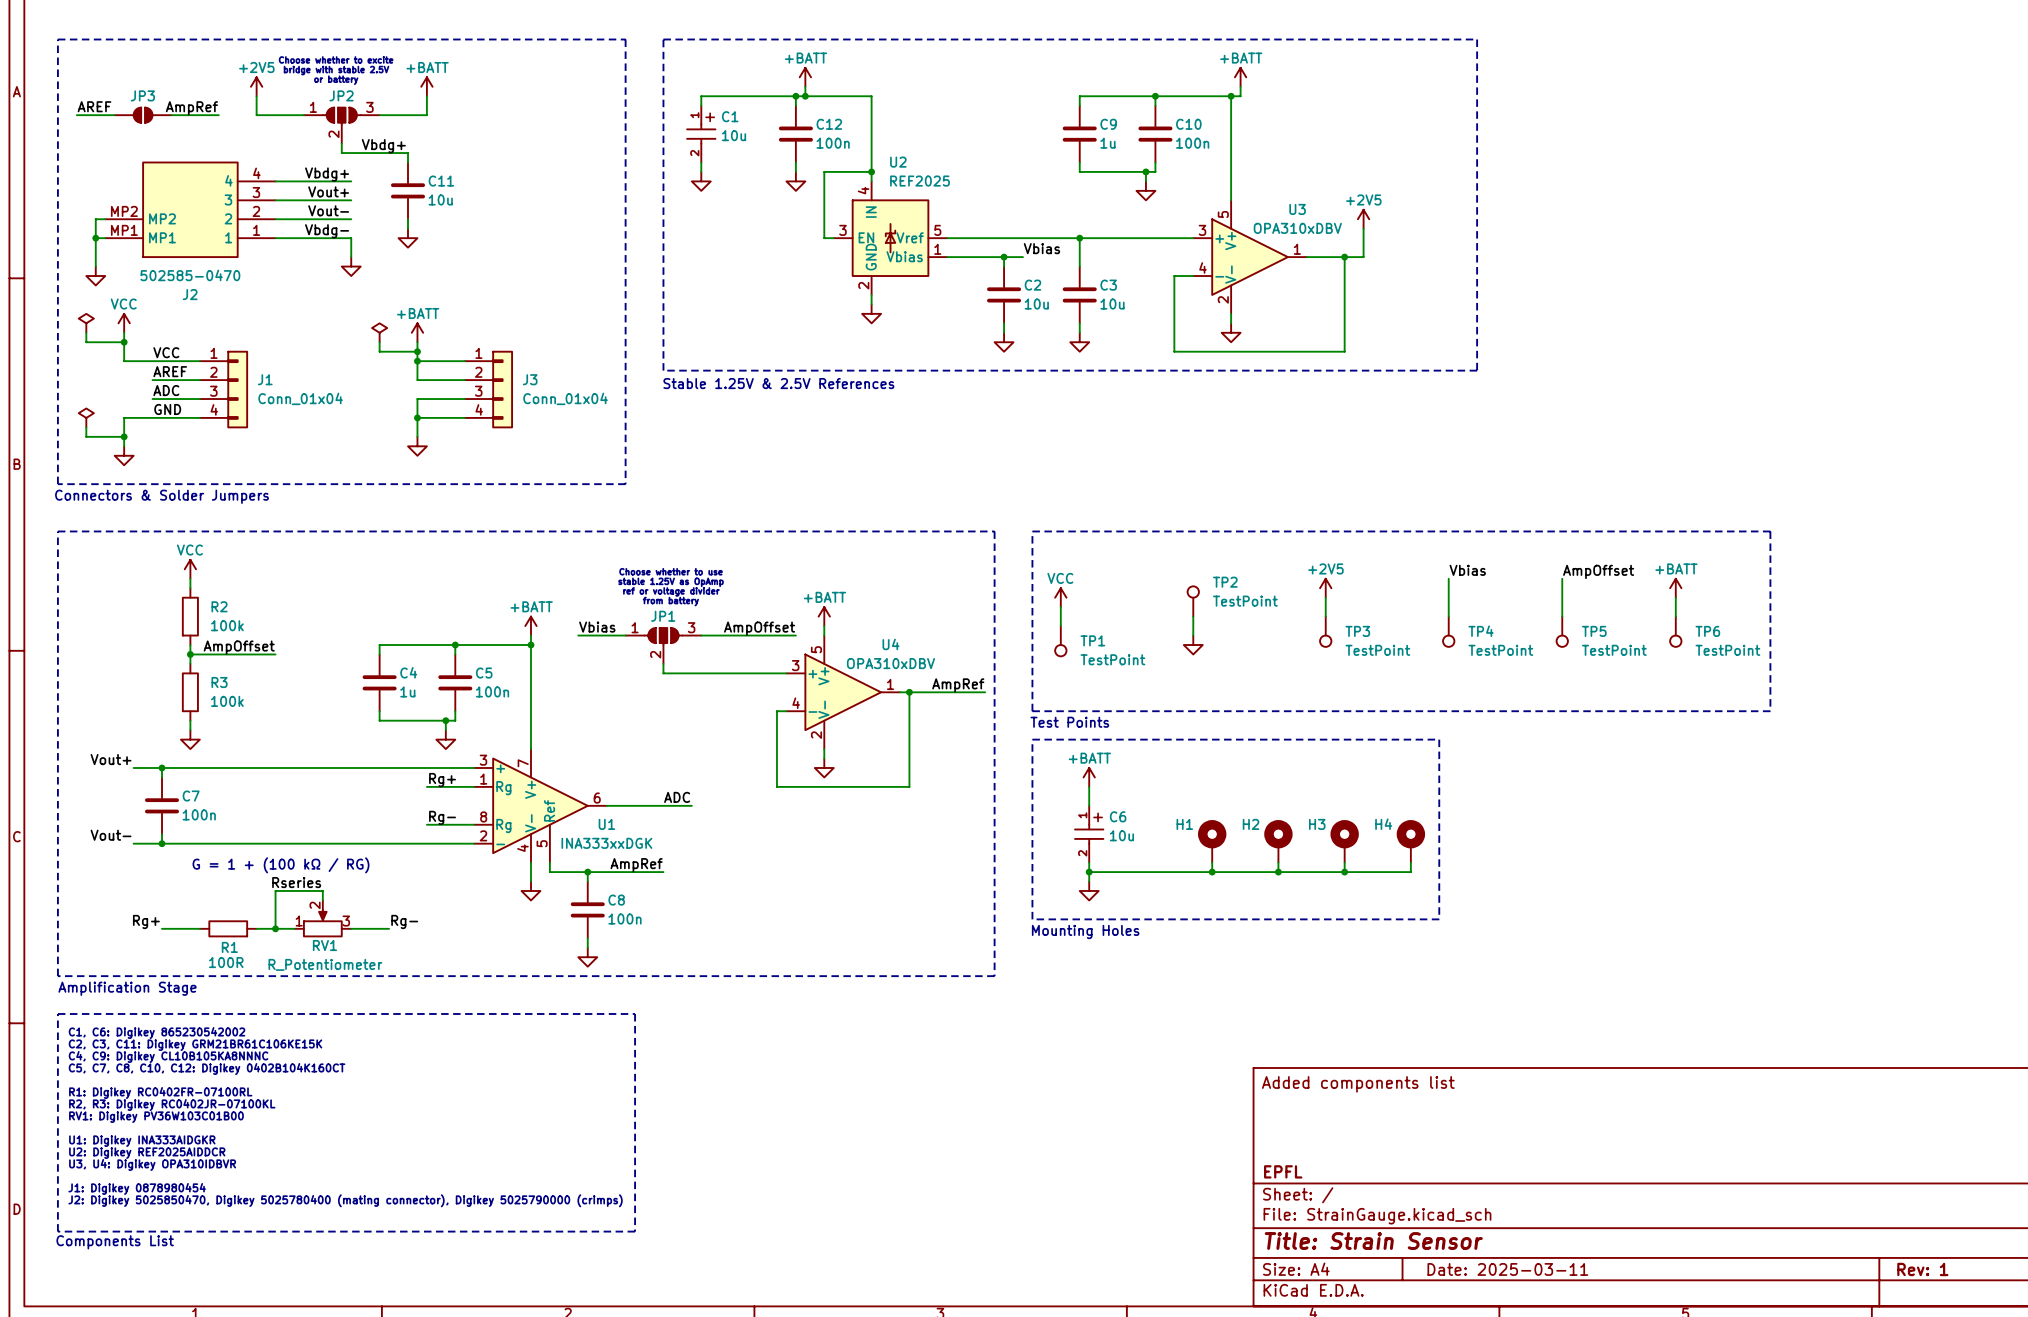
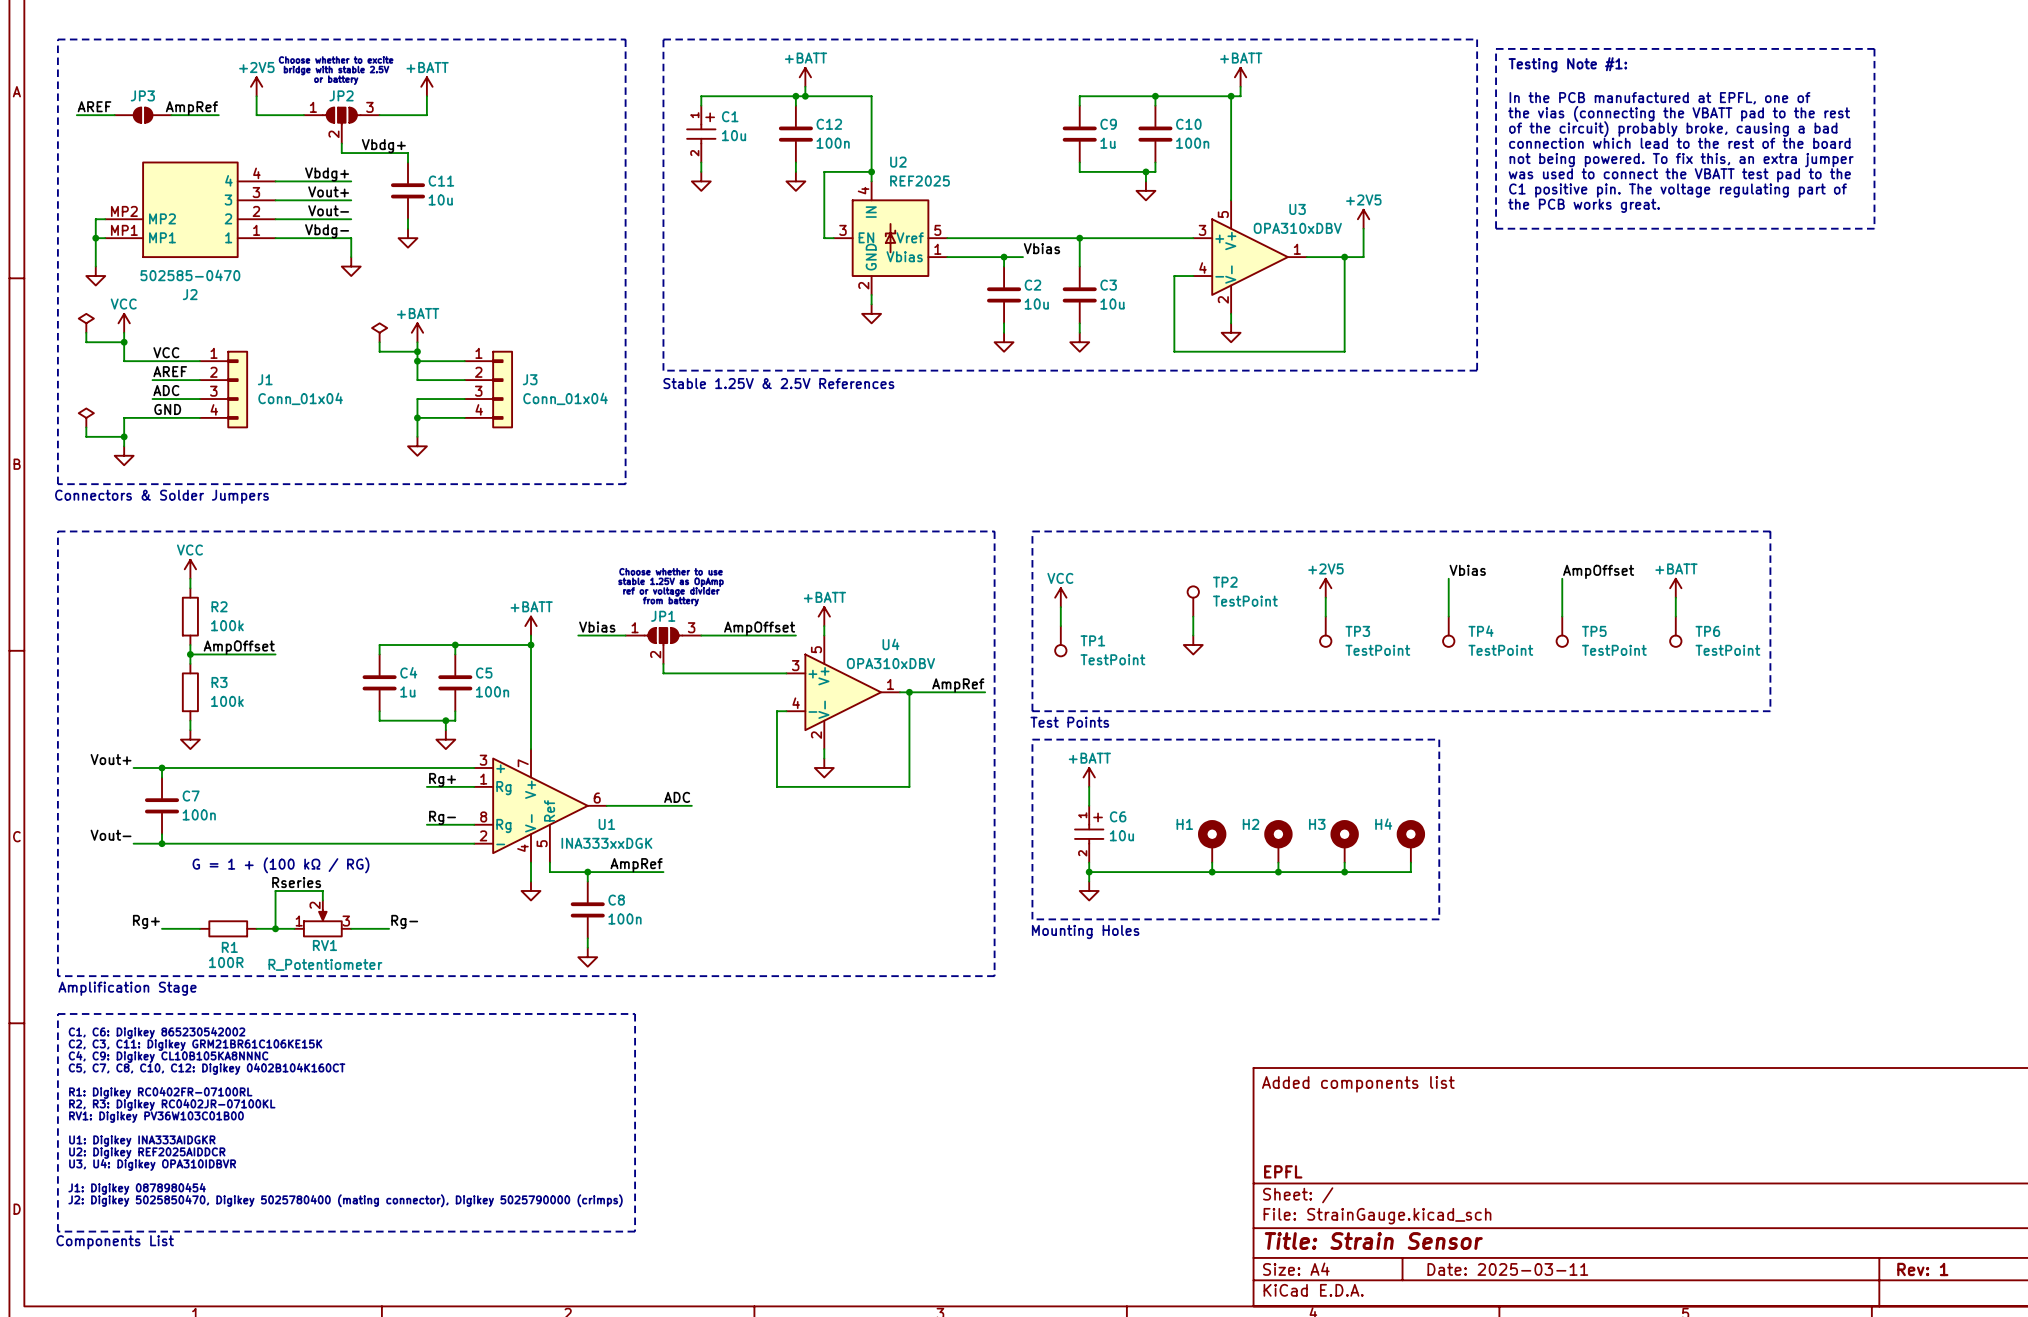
line: none -> (1496, 48) (1874, 48) (1874, 228) (1496, 228) (1496, 48)
text: none -> Testing Note #1: (1567, 64)
text: none -> In the PCB manufactured at EPFL, one of (1659, 98)
text: none -> the vias (connecting the VBATT pad to the rest (1679, 113)
text: none -> of the circuit) probably broke, causing a bad (1673, 129)
text: none -> connection which lead to the rest of the board (1679, 143)
text: none -> not being powered. To fix this, an extra jumper (1681, 160)
text: none -> was used to connect the VBATT test pad to the (1679, 175)
text: none -> C1 positive pin. The voltage regulating part of (1677, 190)
text: none -> the PCB works great. (1584, 205)

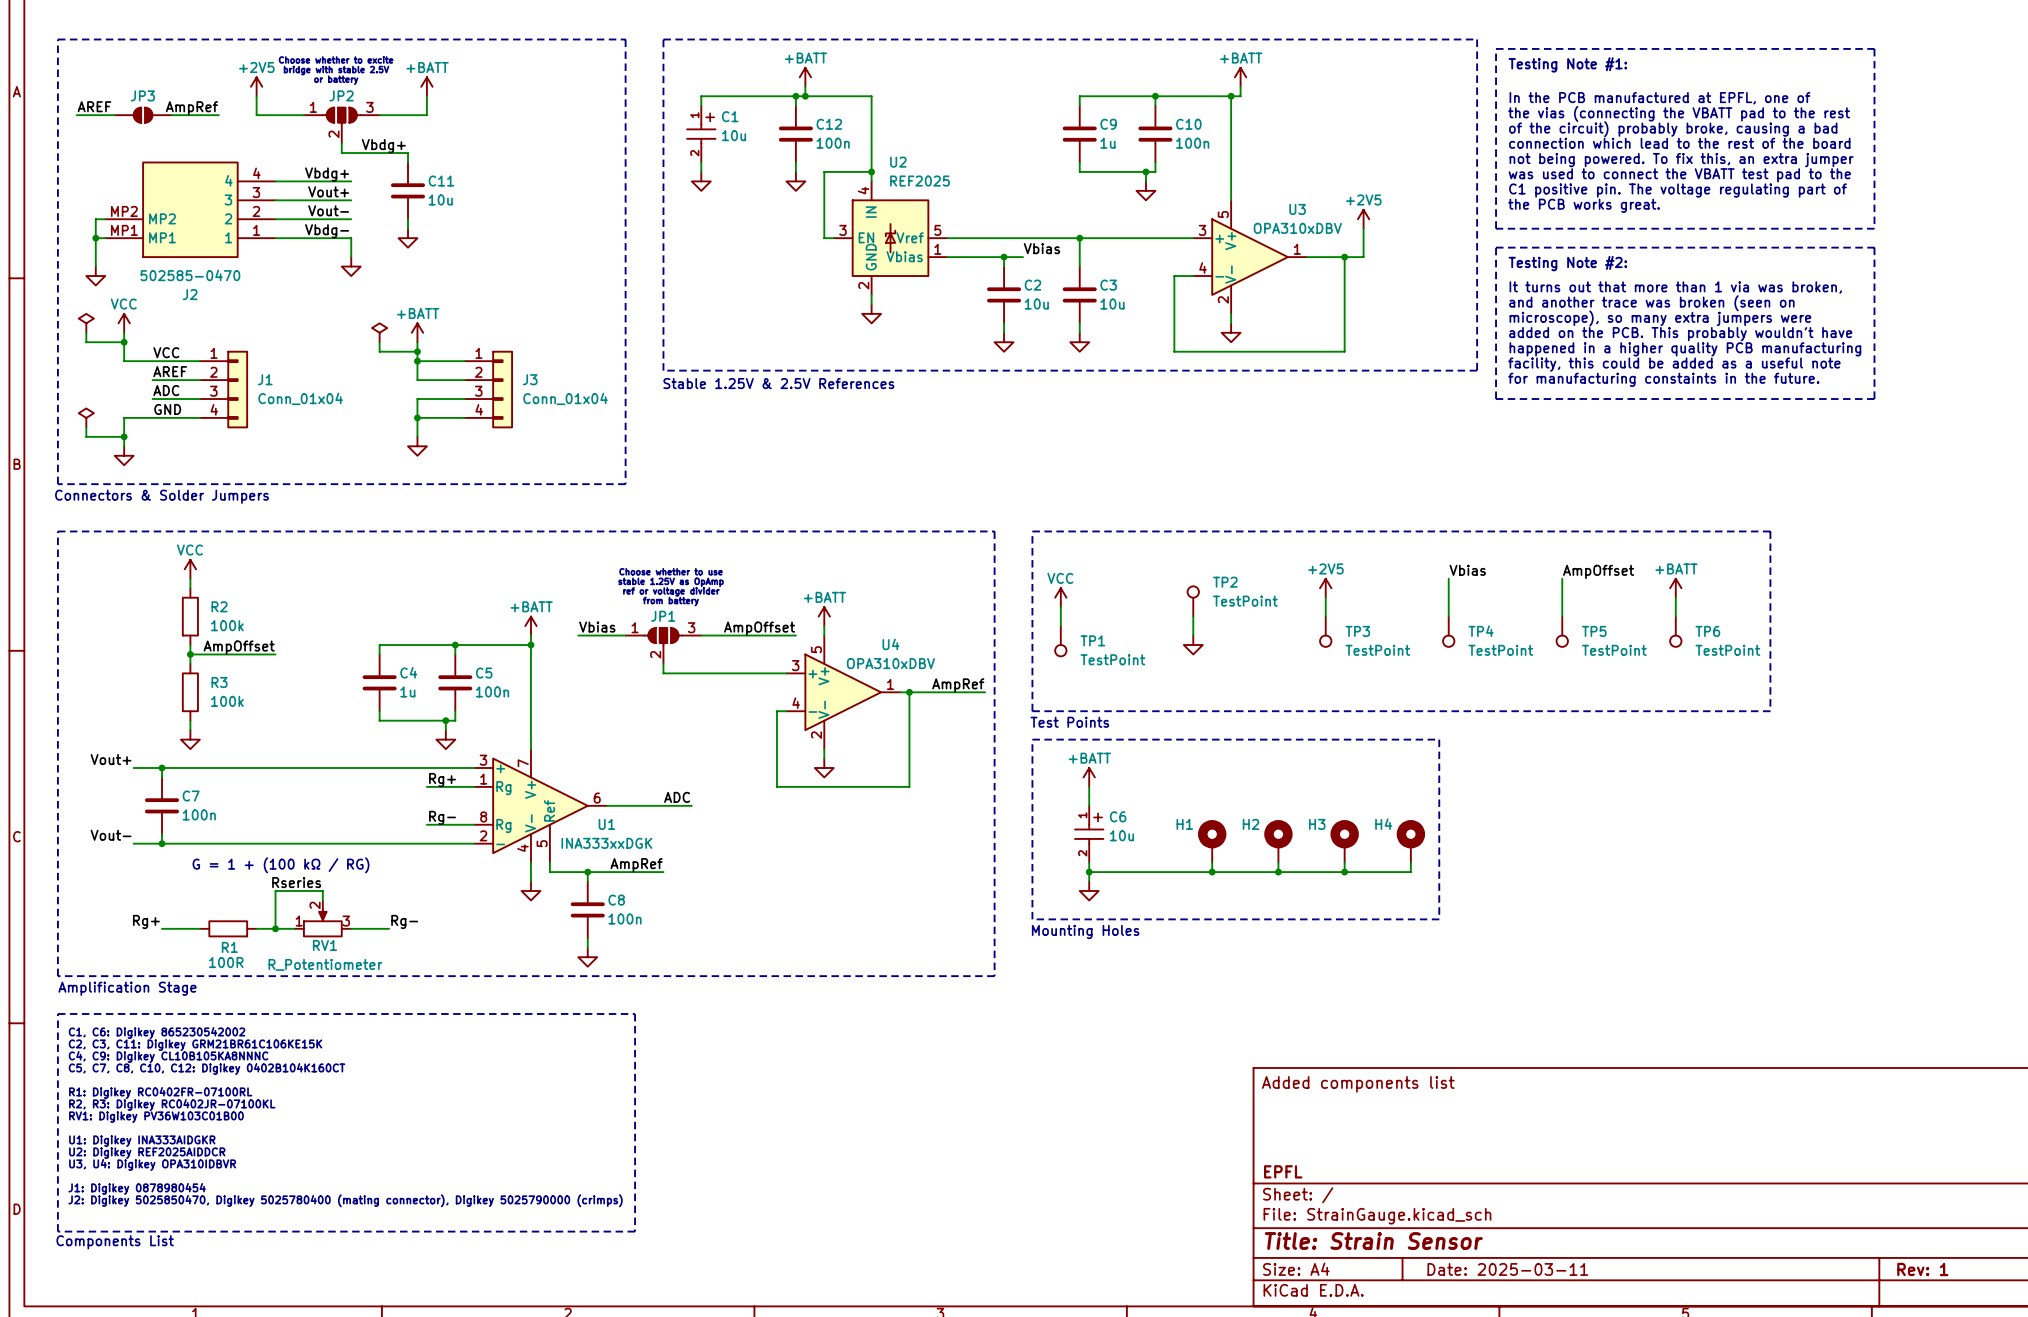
line: none -> (1496, 247) (1874, 247) (1874, 399) (1496, 399) (1496, 247)
text: none -> Testing Note #2: (1567, 263)
text: none -> It turns out that more than 1 via was broken, (1675, 287)
text: none -> and another trace was broken (seen on (1651, 303)
text: none -> microscope), so many extra jumpers were (1660, 318)
text: none -> added on the PCB. This probably wouldn't have (1680, 334)
text: none -> happened in a higher quality PCB manufacturing (1685, 349)
text: none -> facility, this could be added as a useful note (1674, 364)
text: none -> for manufacturing constaints in the future. (1663, 379)

